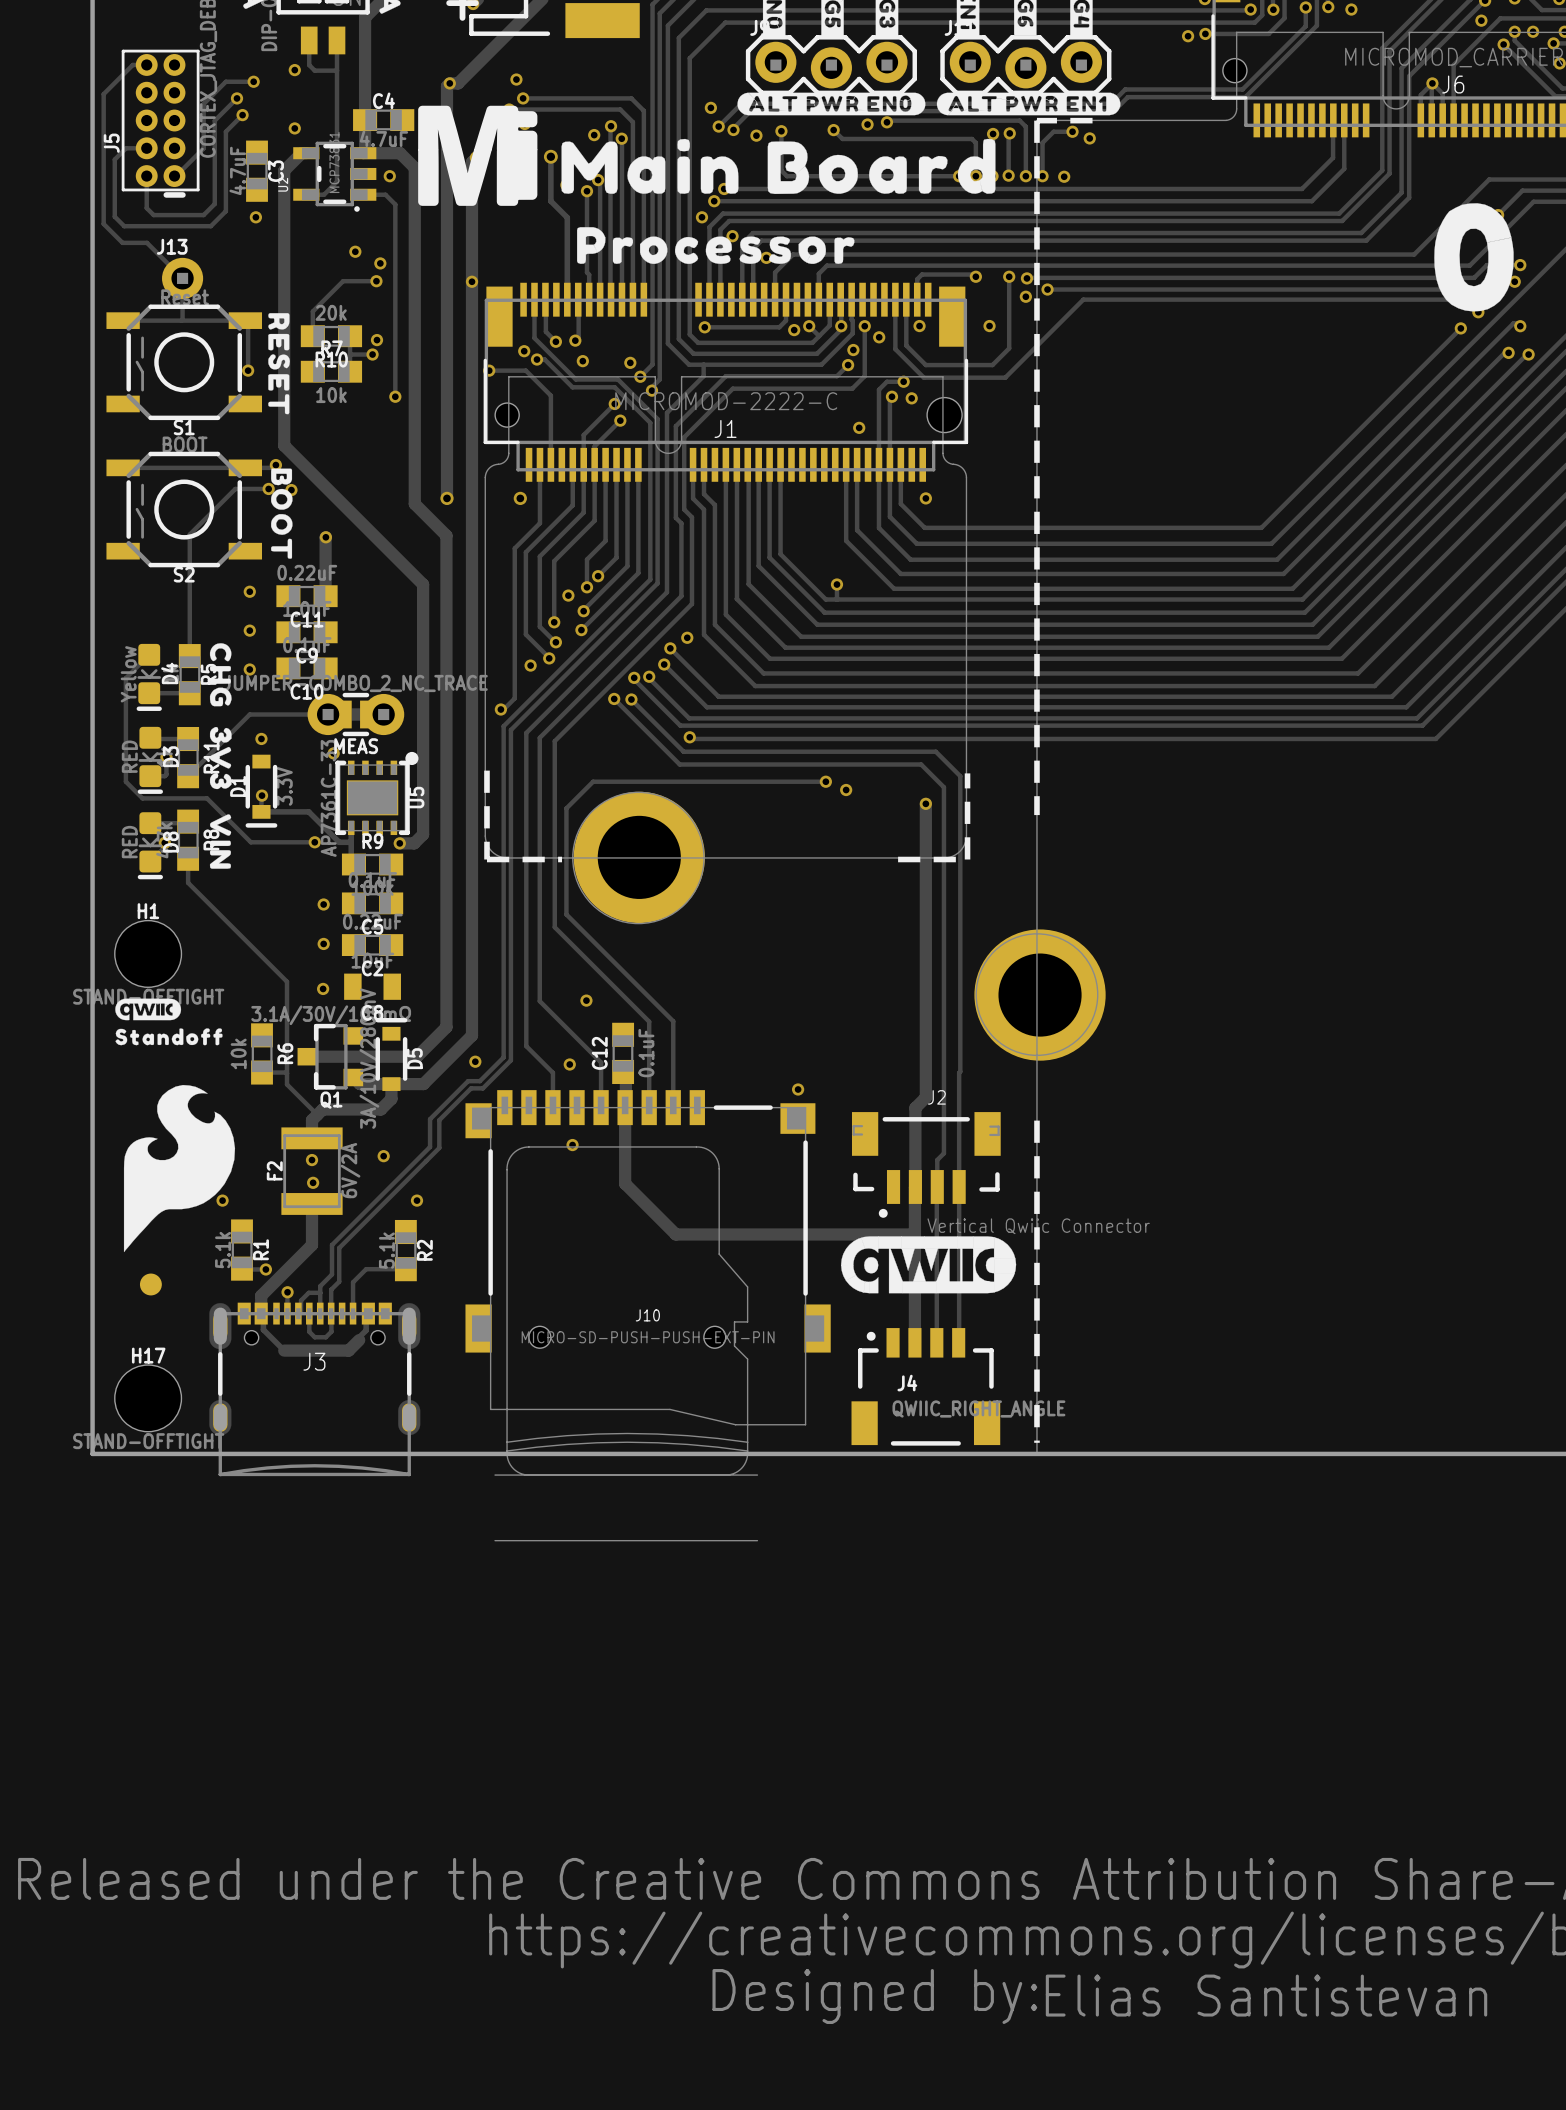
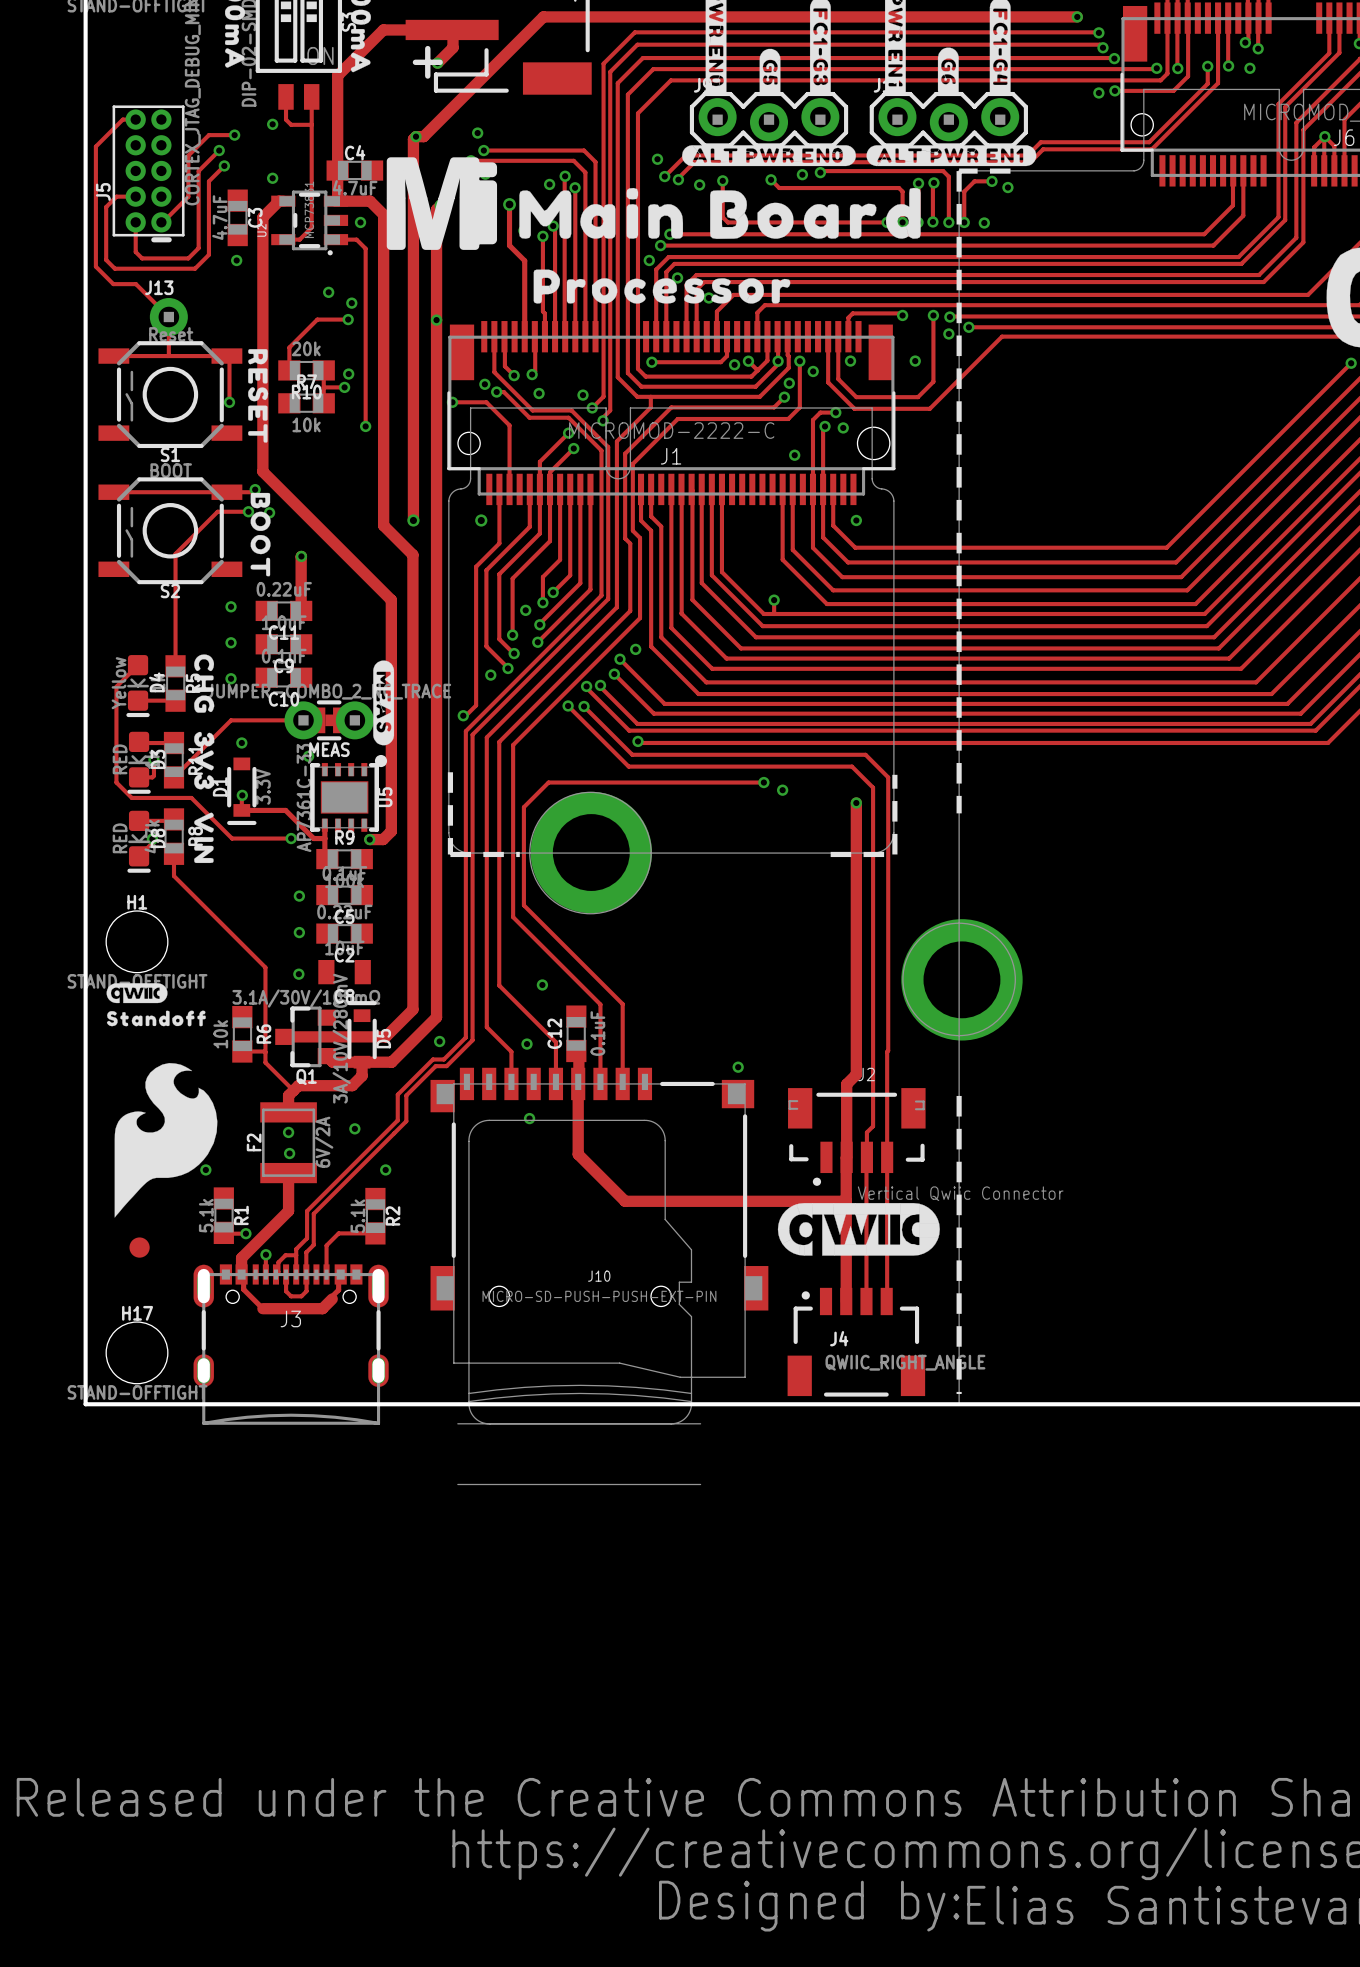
drawing: none -> [373, 660, 395, 746]

